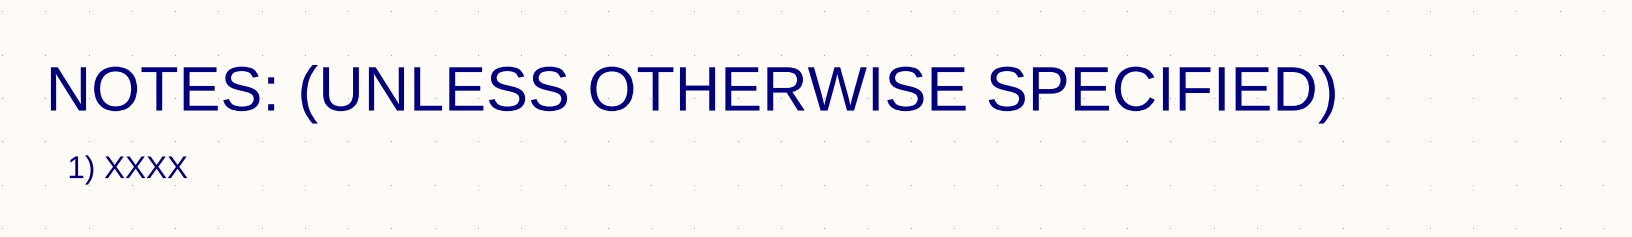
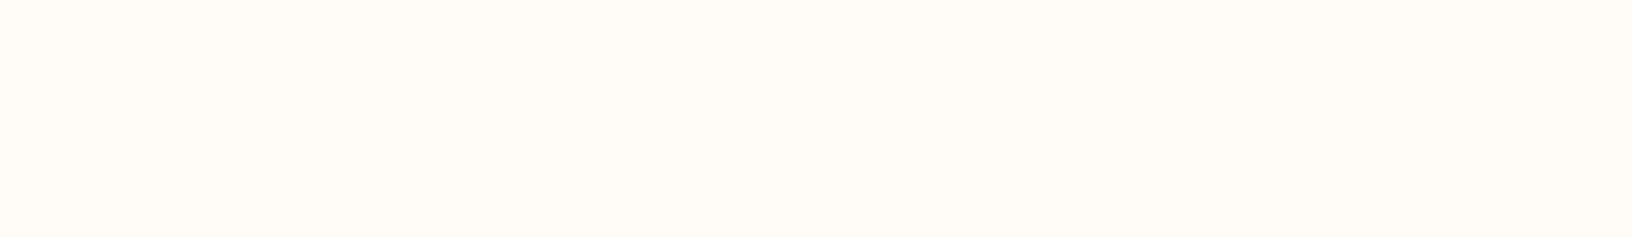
text: NOTES: (UNLESS OTHERWISE SPECIFIED) (692, 94) -> none
text: 1) XXXX (128, 169) -> none

